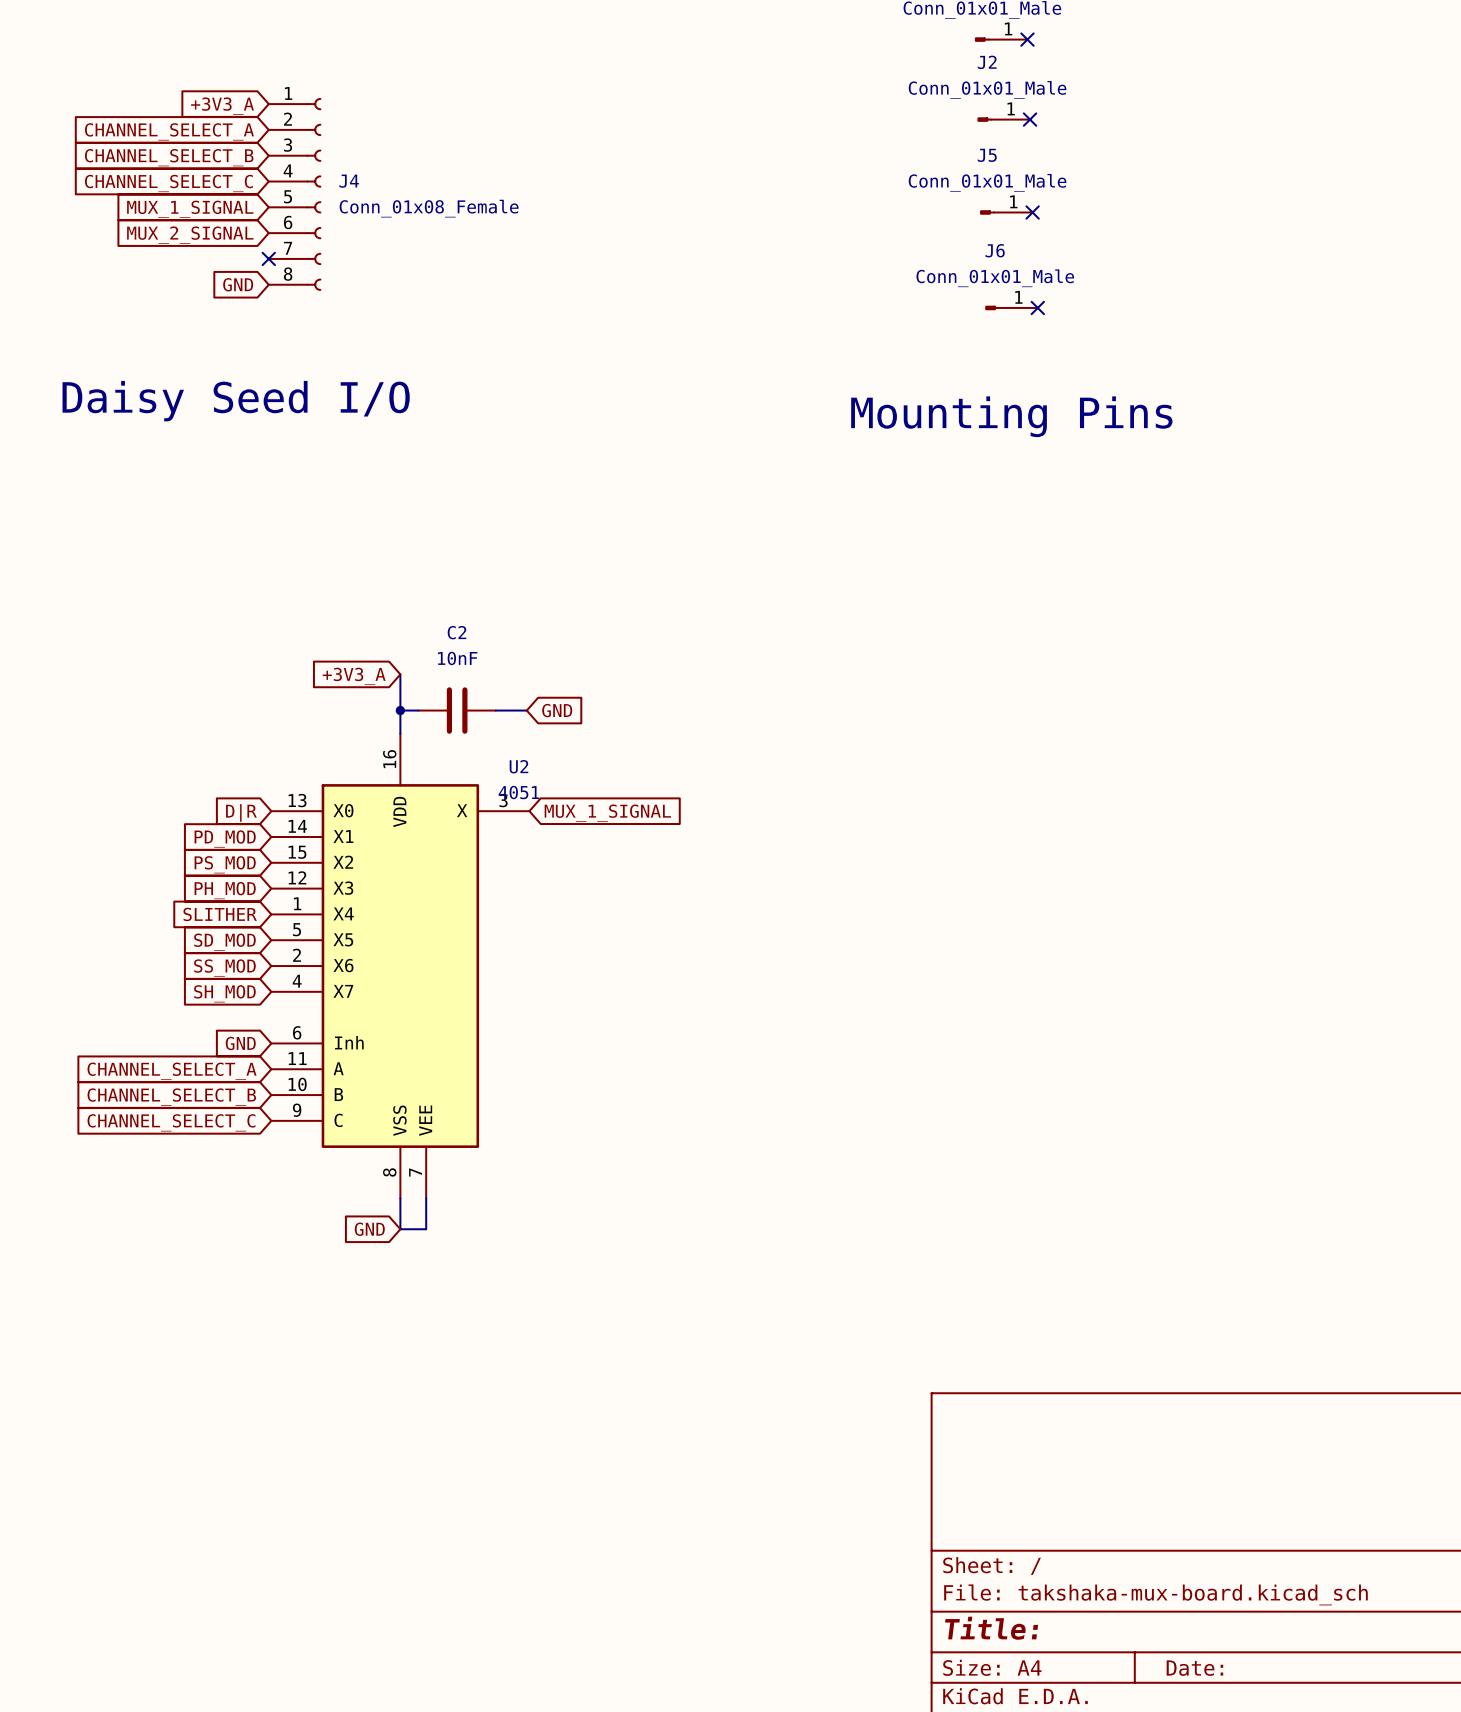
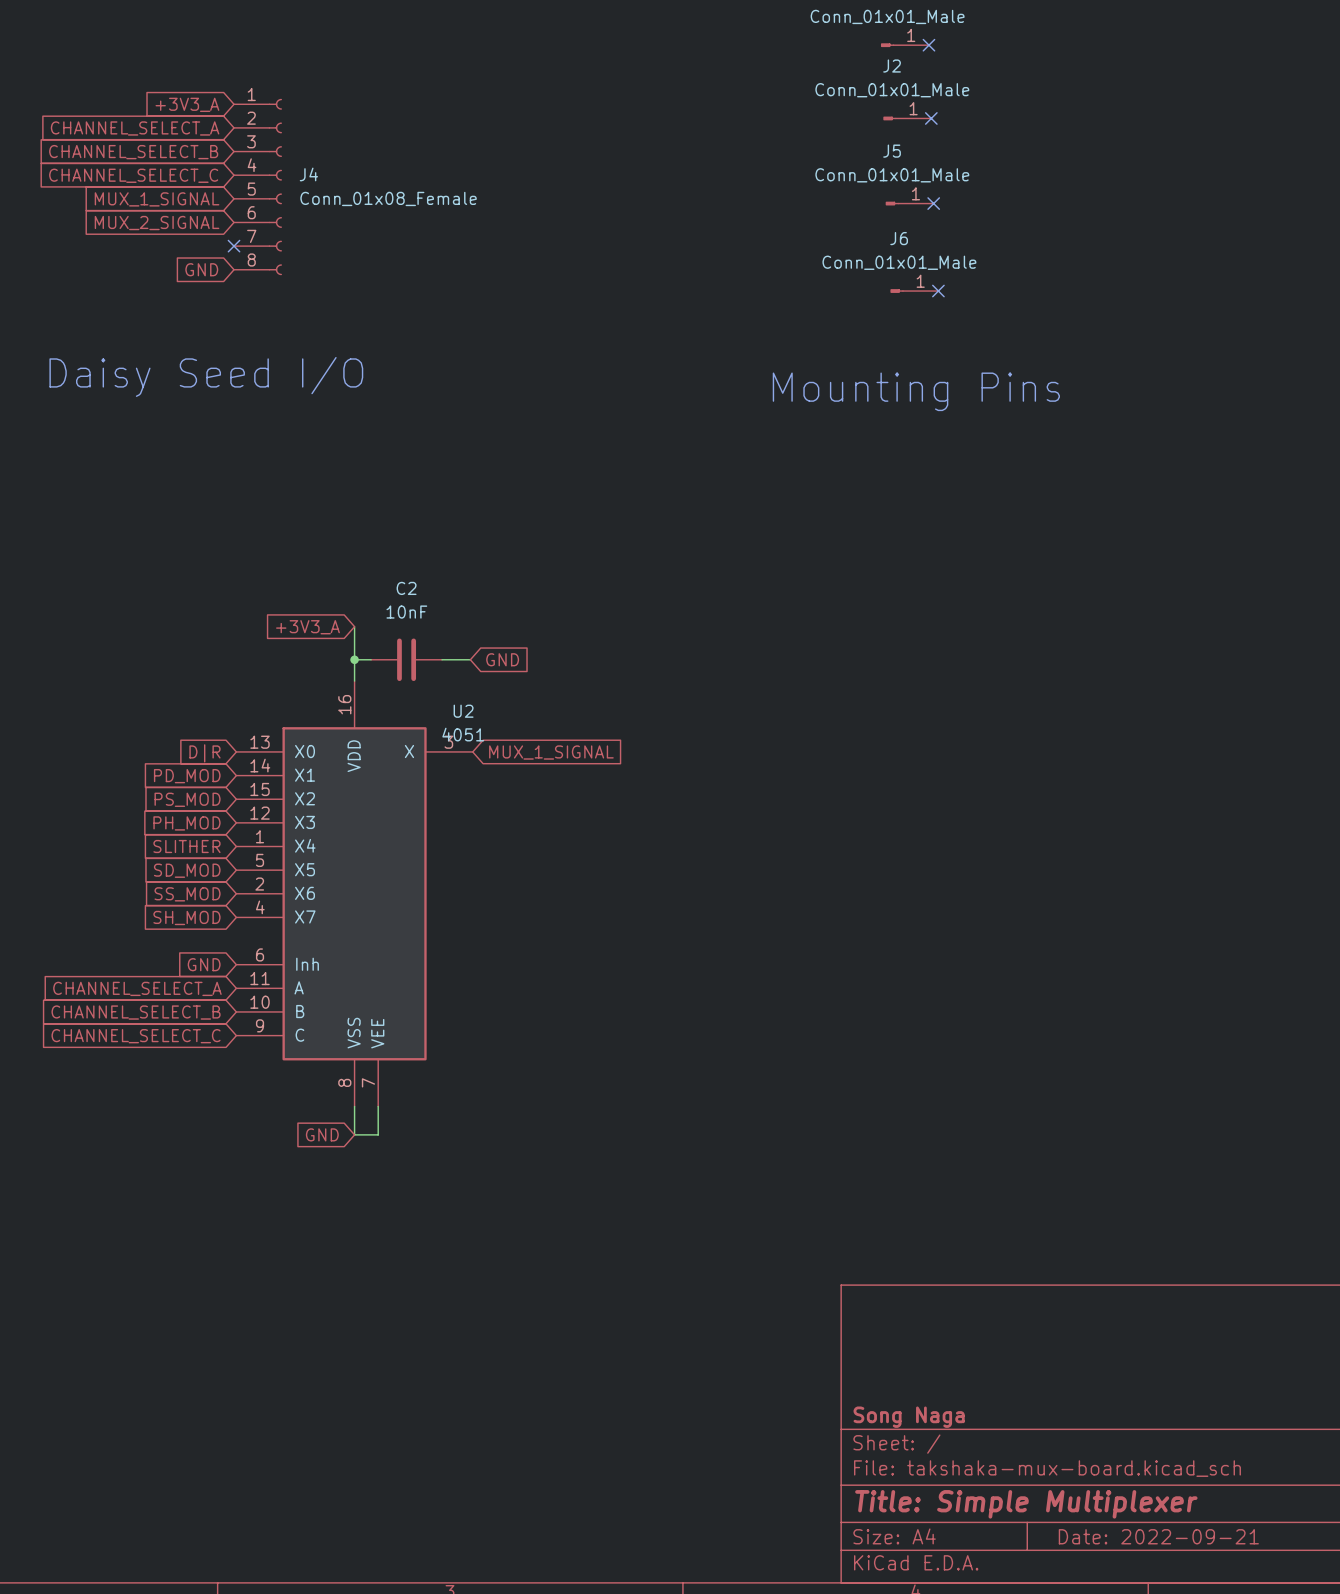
title block: none -> Song Naga (909, 1417)
title block: Title: (991, 1628) -> Title: Simple Multiplexer (1026, 1504)
title block: Date: (1194, 1668) -> Date: 2022-09-21 (1158, 1536)

